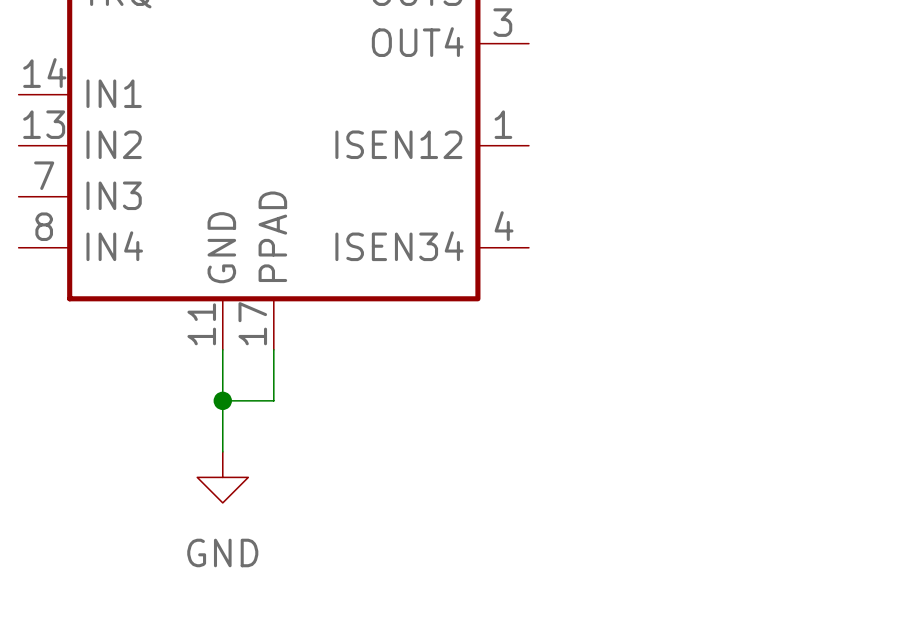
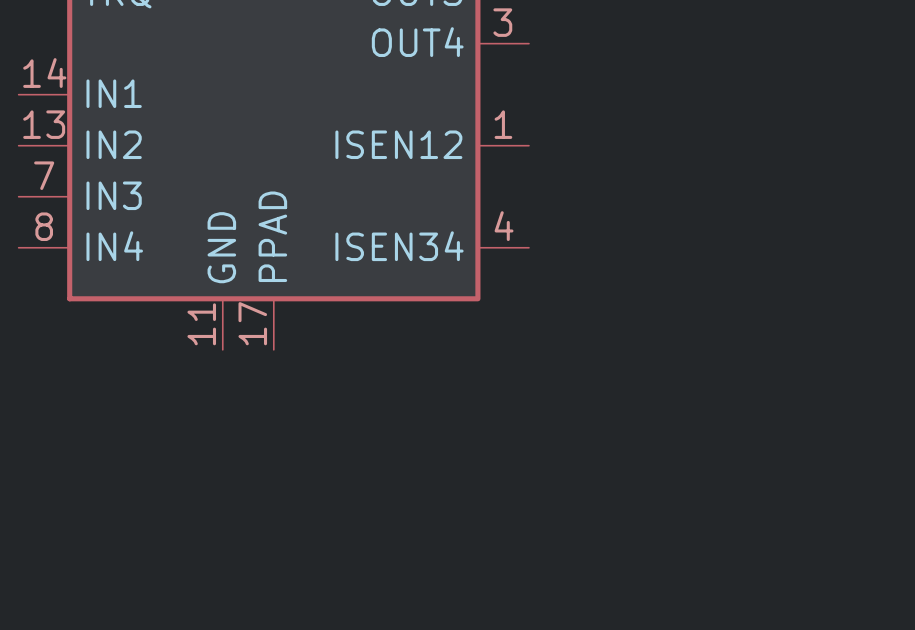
wire: (222, 349) (222, 451) -> none
wire: (273, 349) (273, 400) (222, 400) -> none
junction: (222, 400) -> none
power symbol: GND (222, 477) -> none

